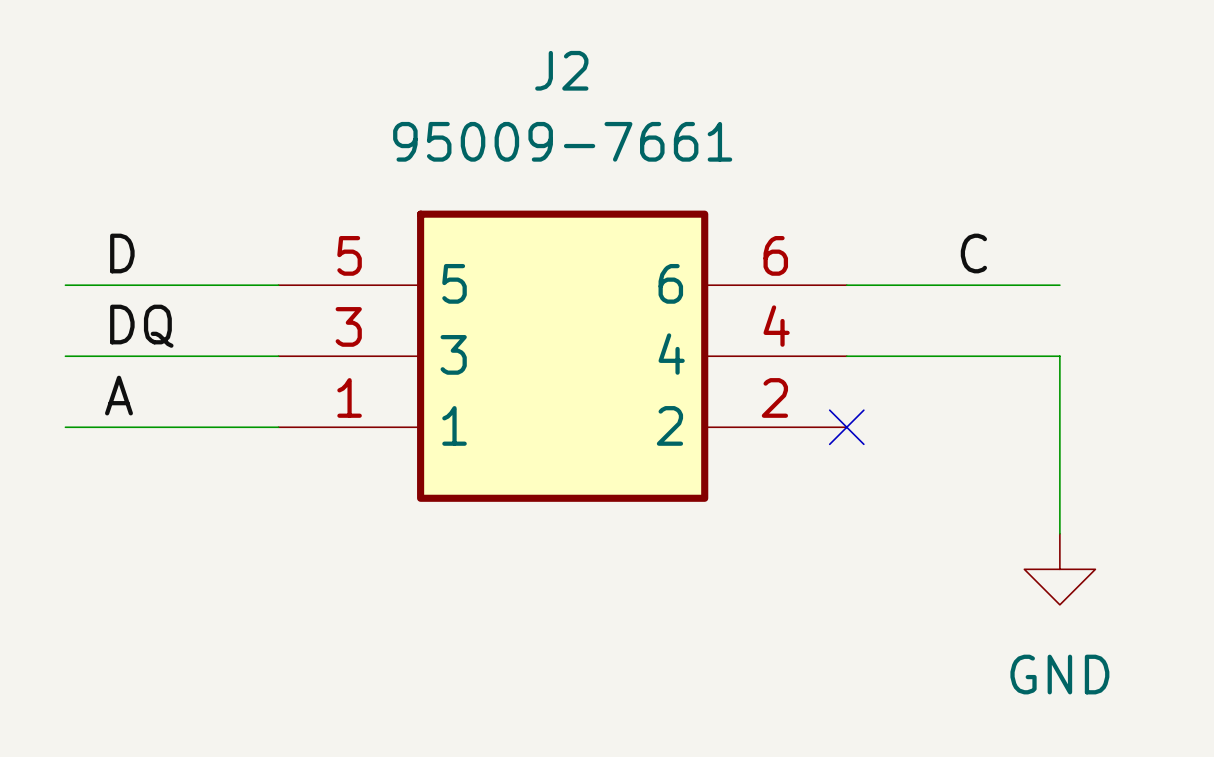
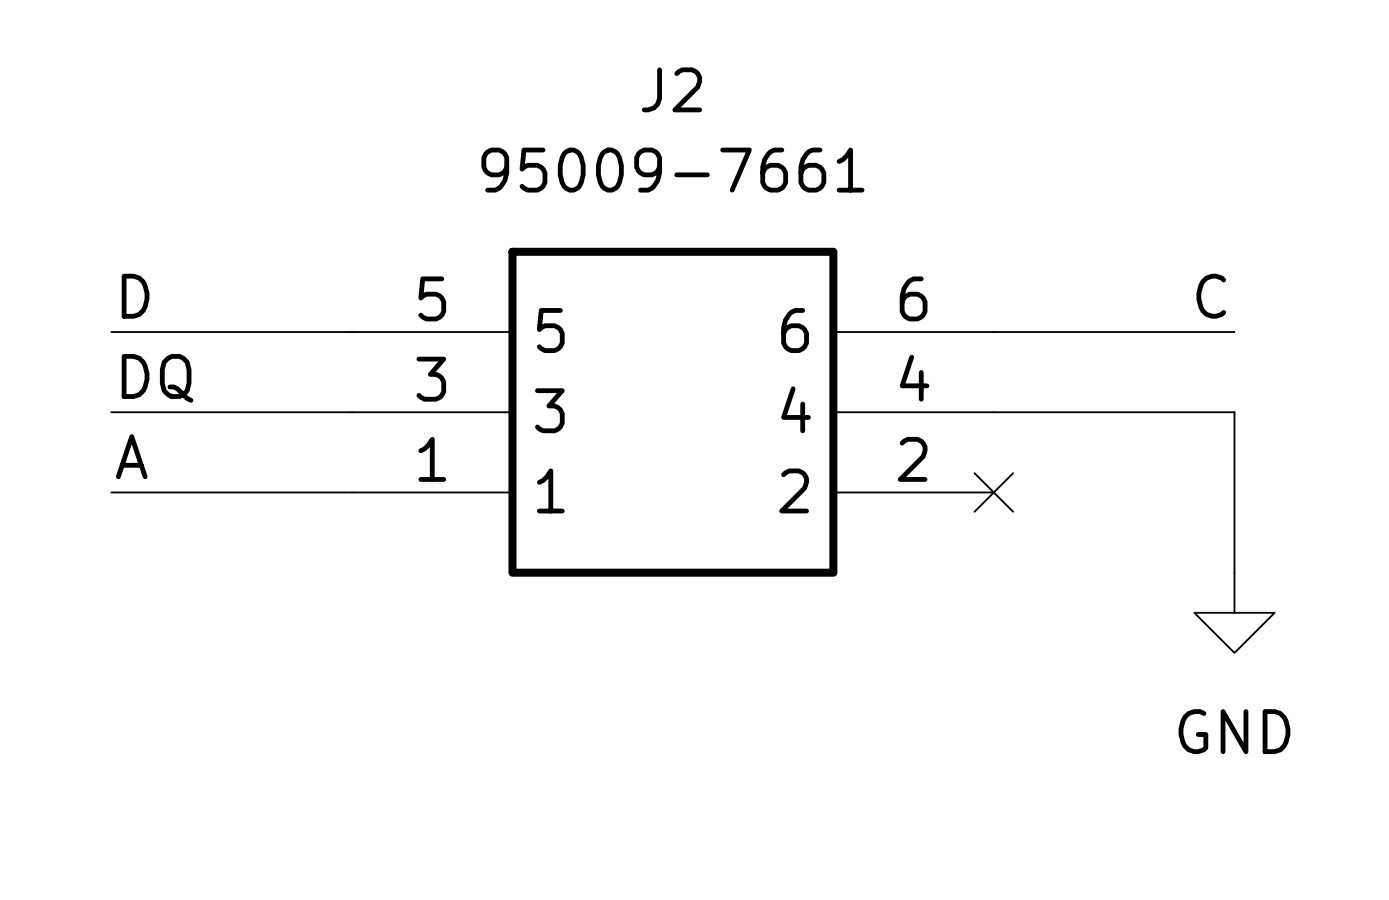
label position: D (122, 253) -> D (135, 296)
label position: C (973, 253) -> C (1211, 296)
label position: DQ (141, 326) -> DQ (157, 378)
label position: A (118, 395) -> A (131, 456)
power symbol position: GND (1059, 569) -> GND (1234, 612)

